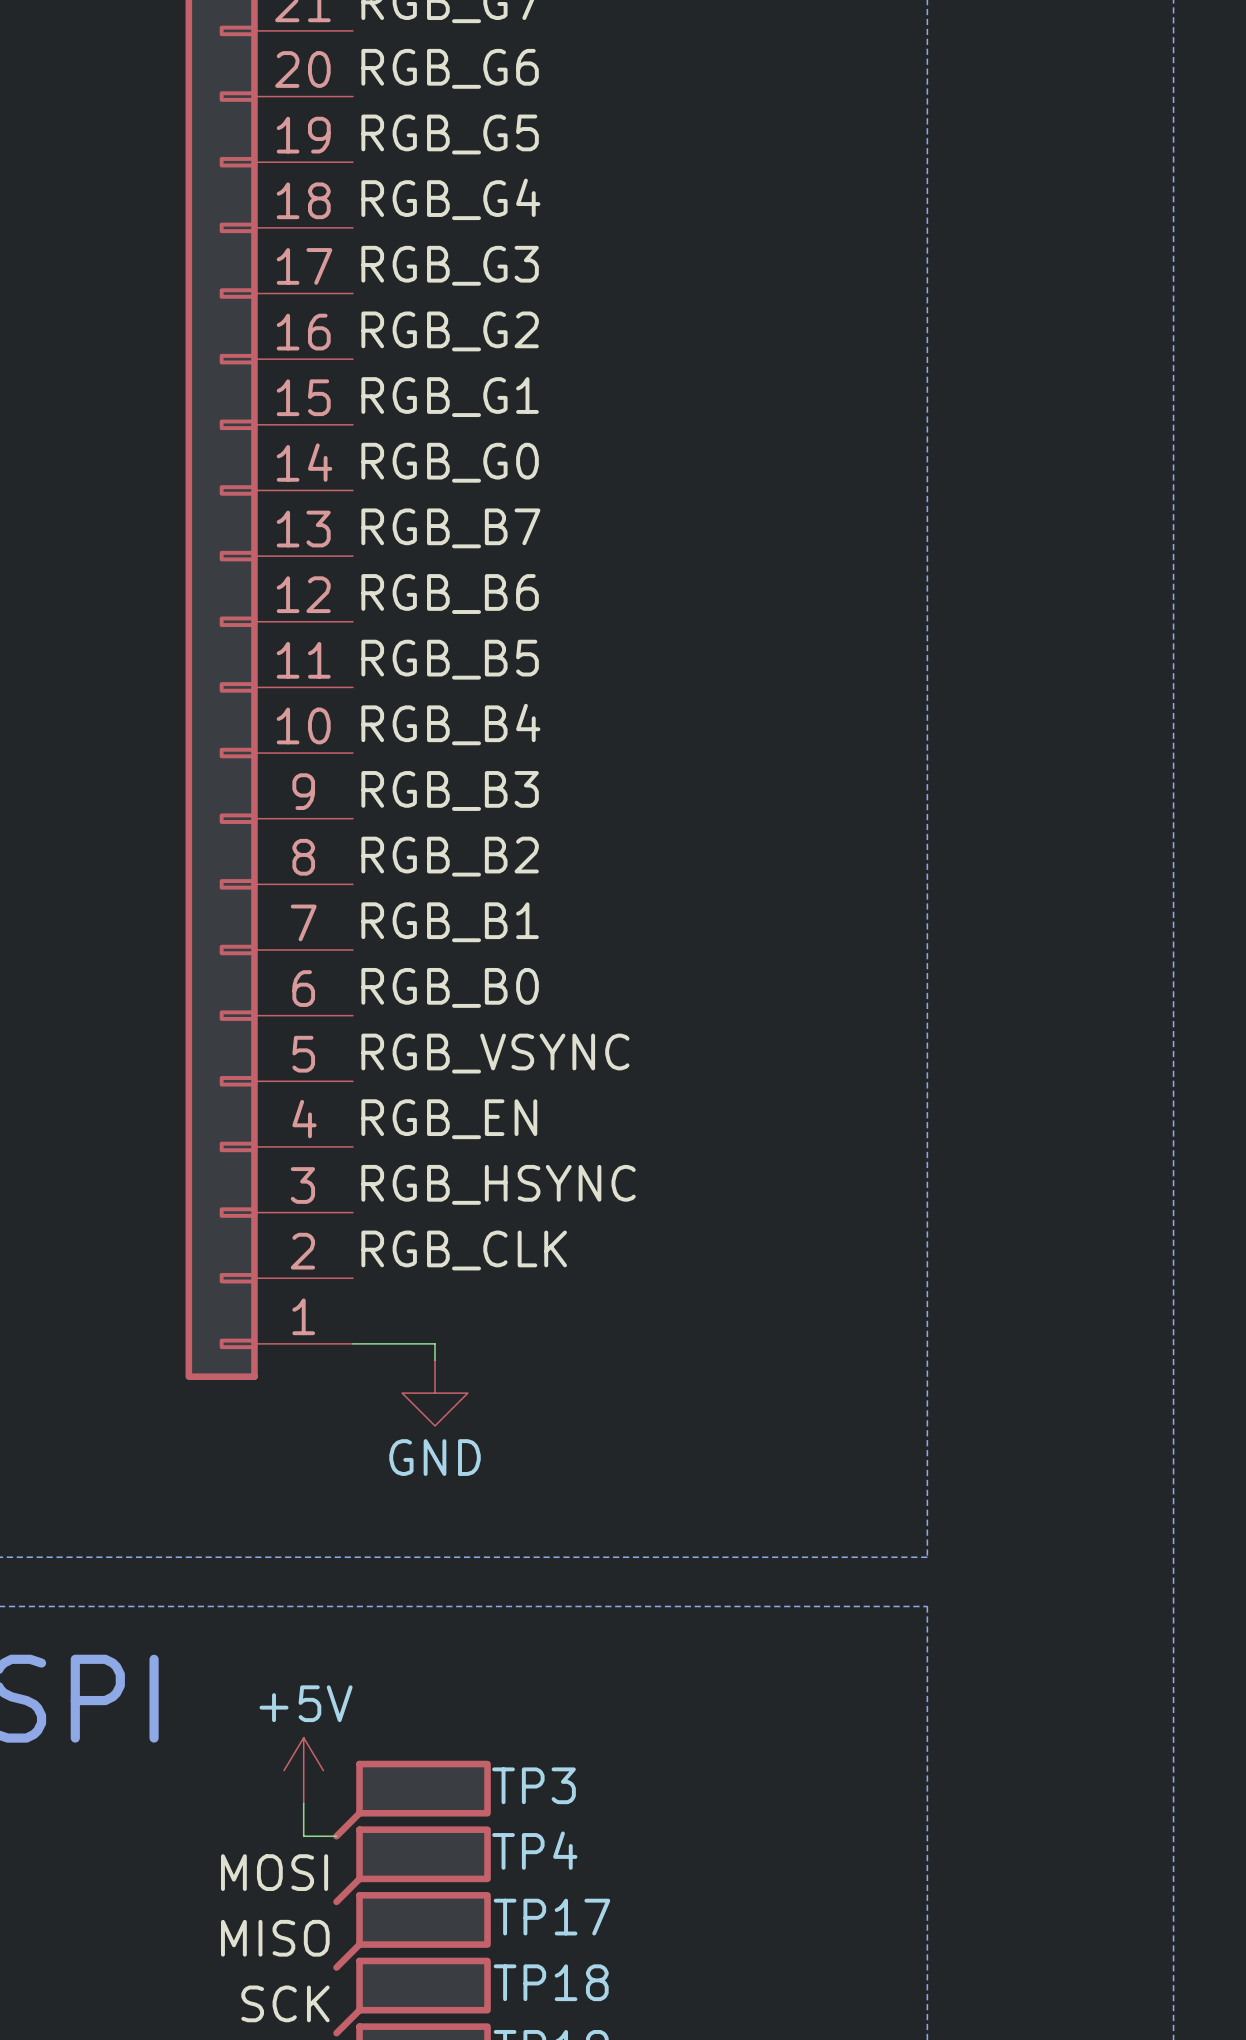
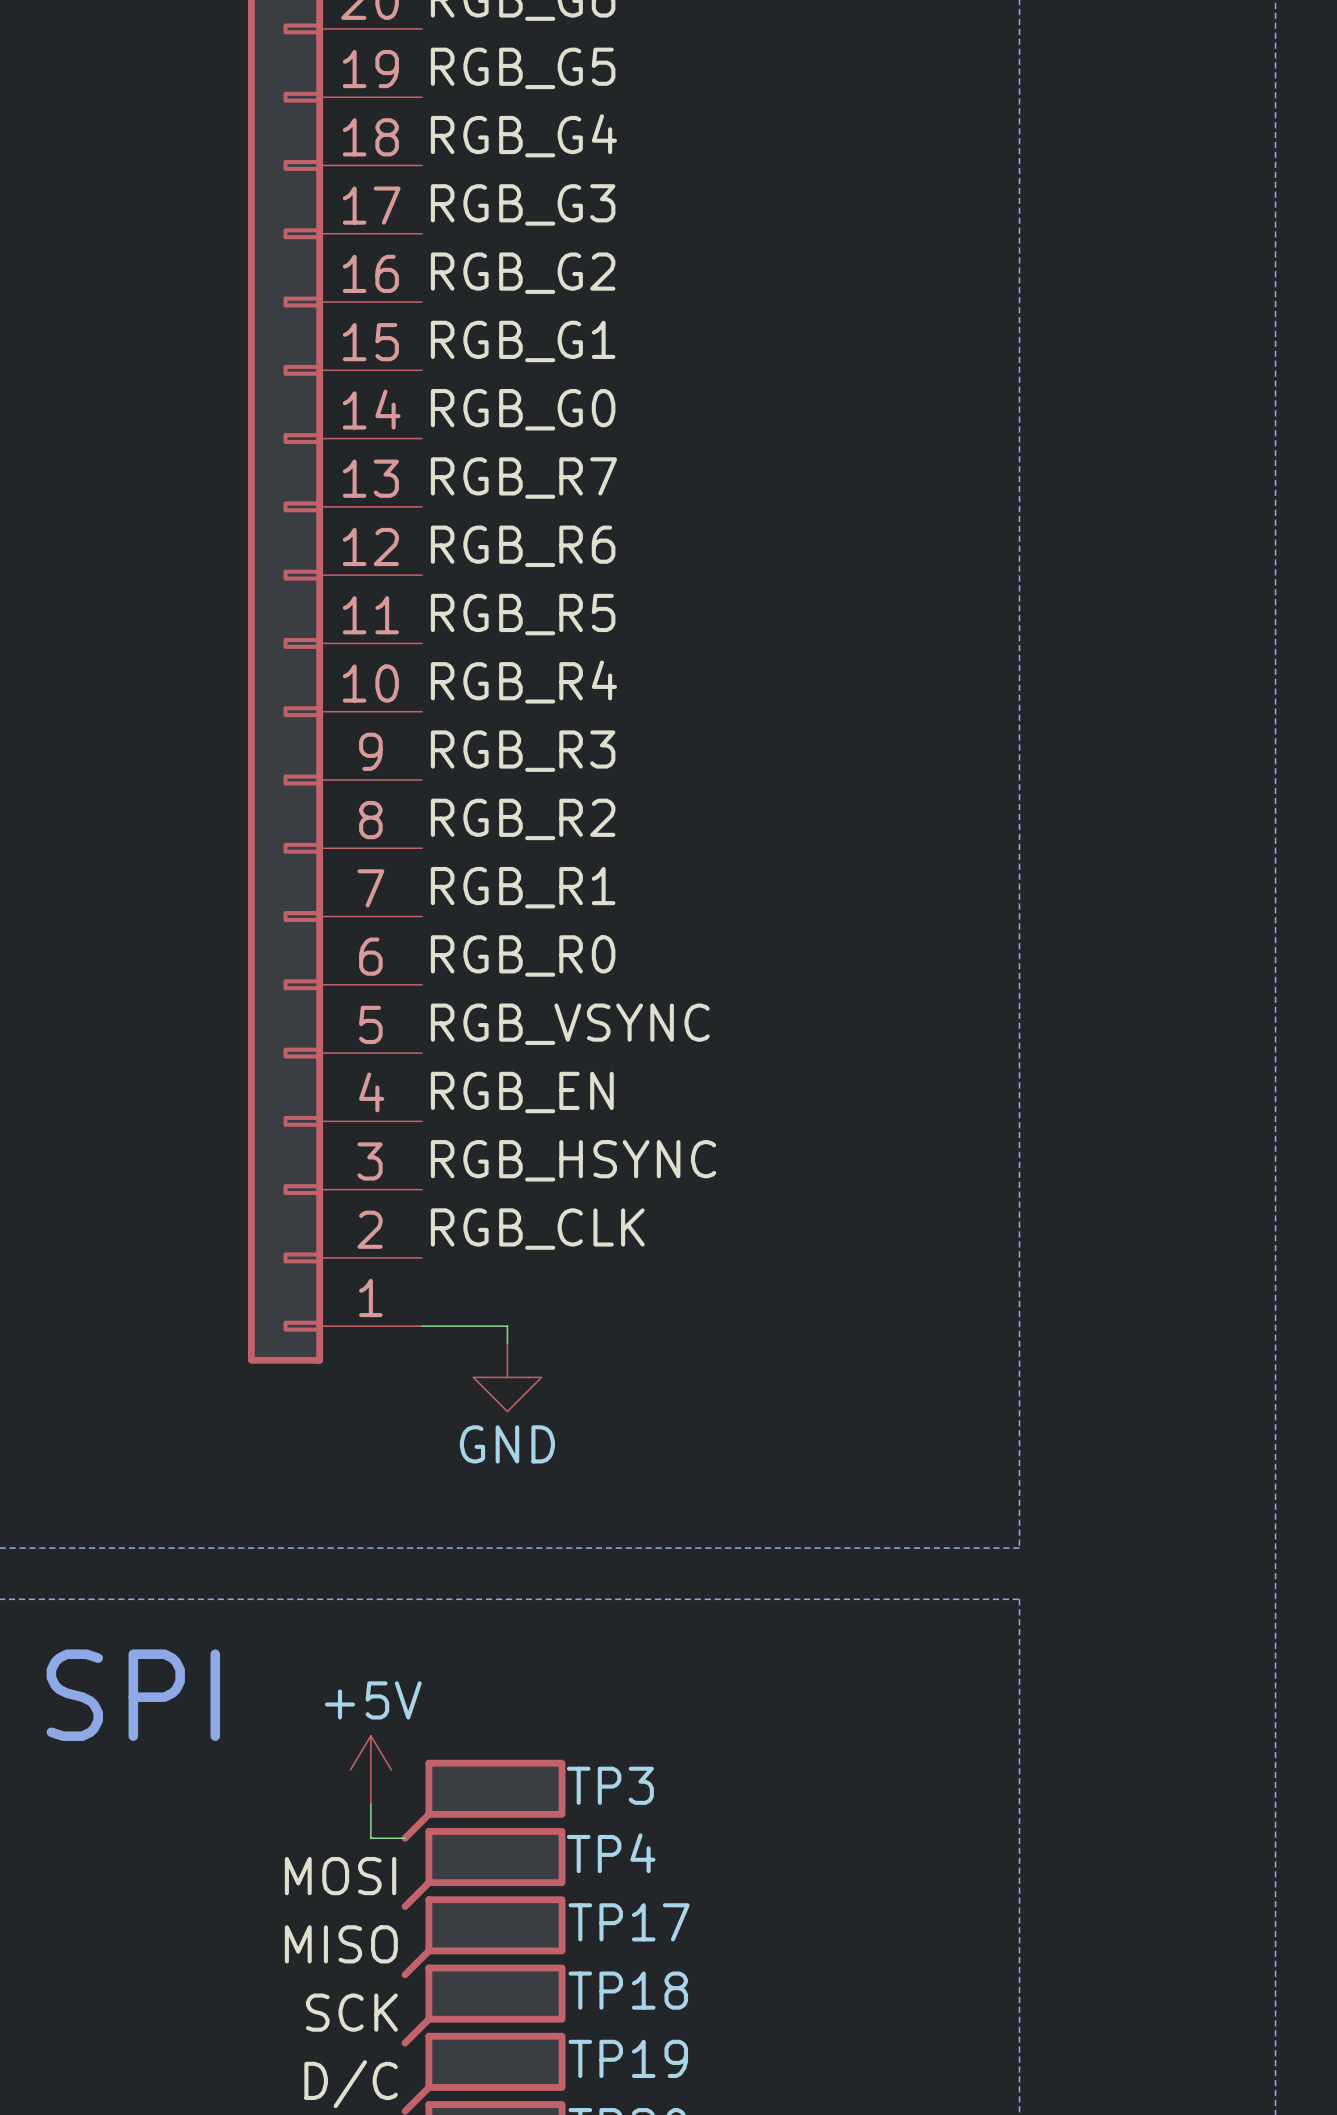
label: RGB_B7 (450, 528) -> RGB_R7 (523, 478)
label: RGB_B6 (450, 594) -> RGB_R6 (523, 546)
label: RGB_B5 (450, 659) -> RGB_R5 (523, 614)
label: RGB_B4 (450, 724) -> RGB_R4 (523, 682)
label: RGB_B3 (450, 790) -> RGB_R3 (523, 751)
label: RGB_B2 (450, 856) -> RGB_R2 (523, 819)
label: RGB_B1 (450, 922) -> RGB_R1 (523, 887)
label: RGB_B0 (450, 987) -> RGB_R0 (523, 955)

